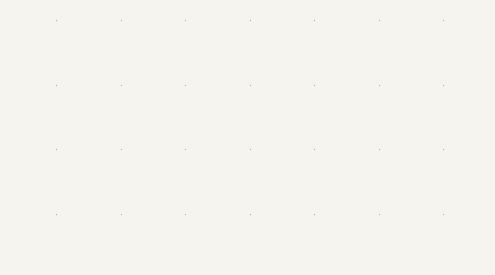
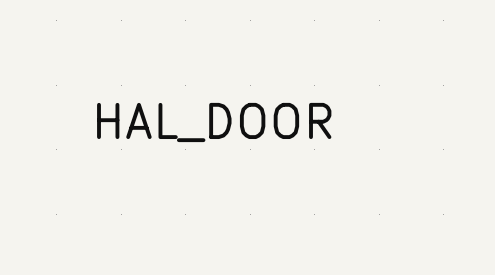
label: none -> HAL_DOOR (214, 122)

